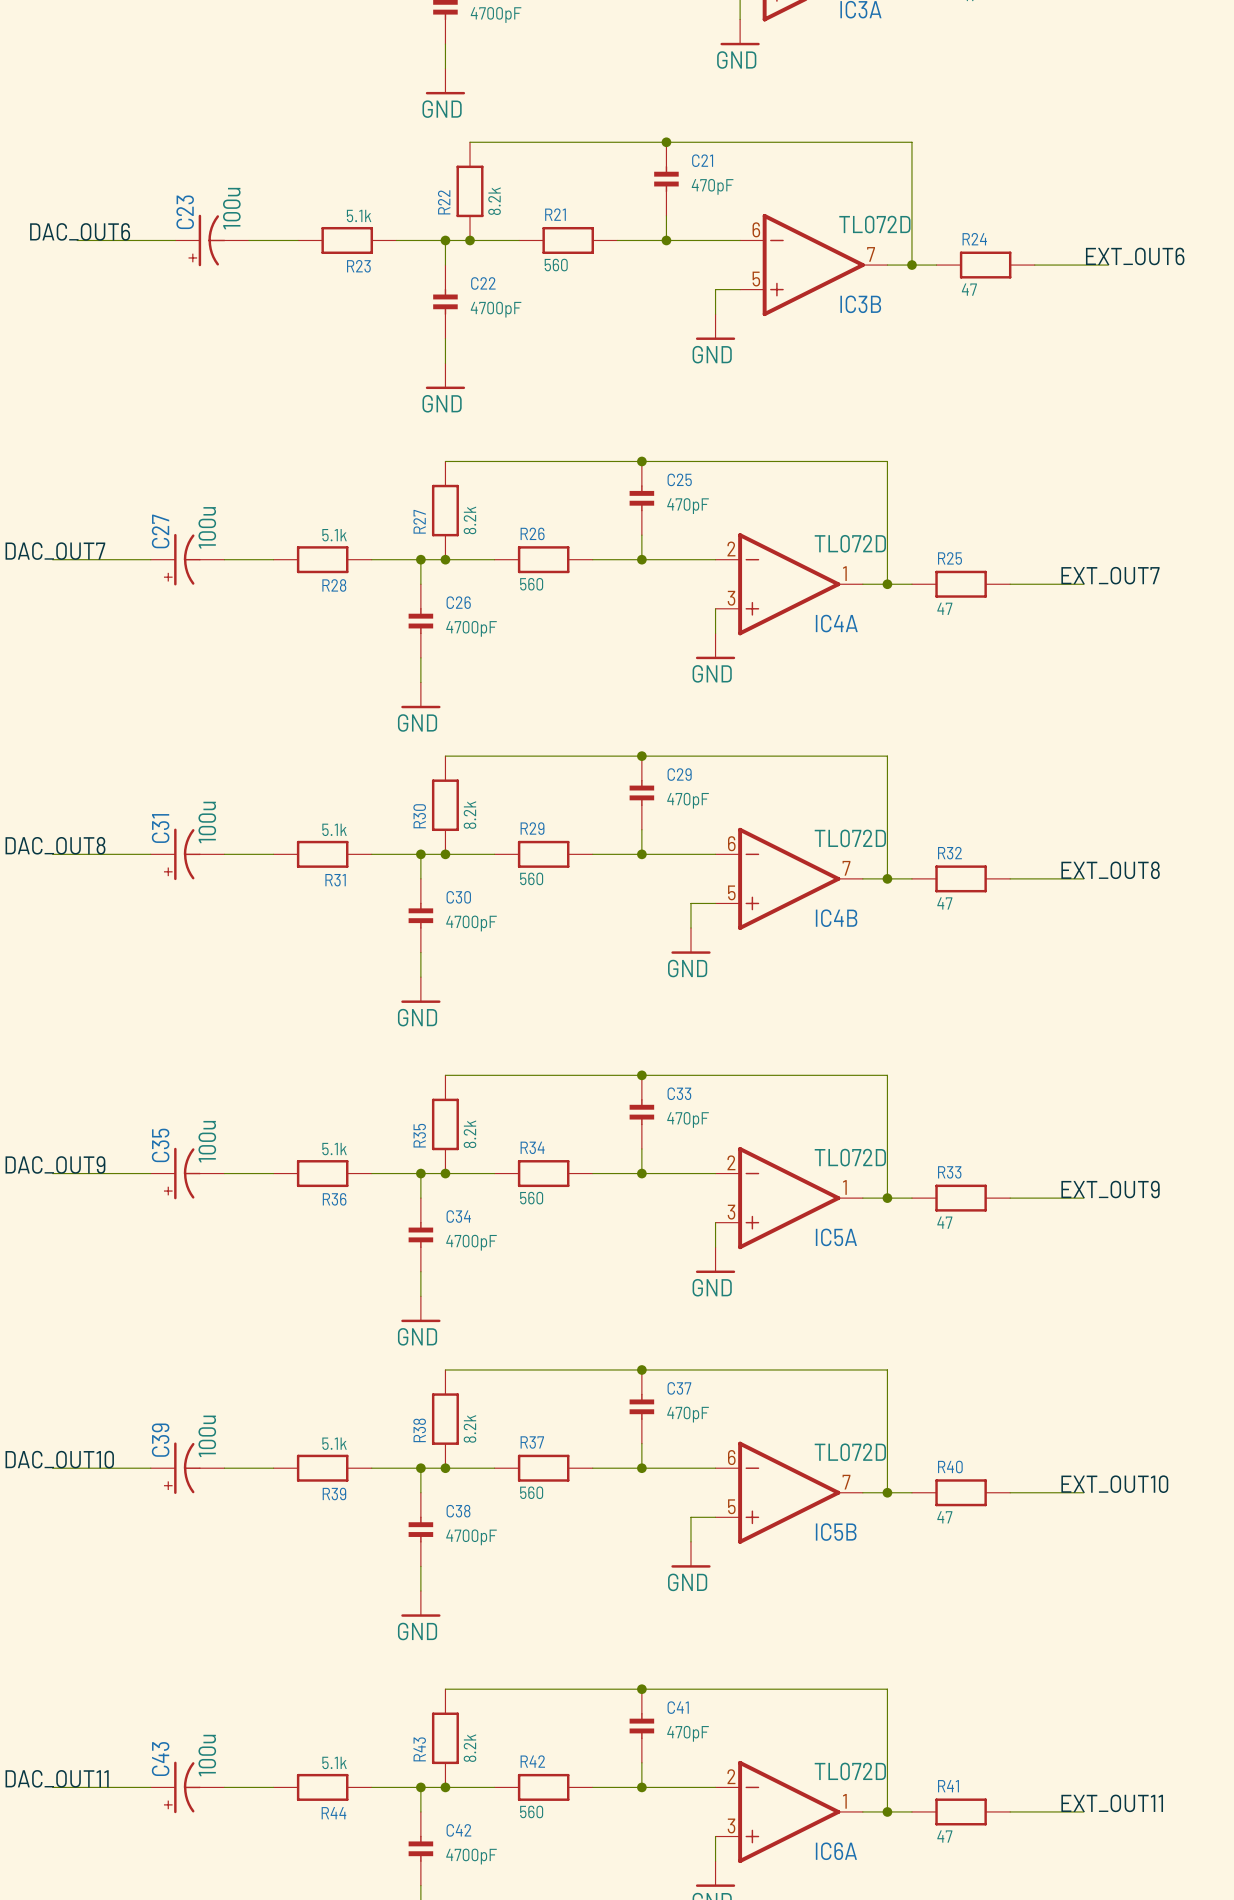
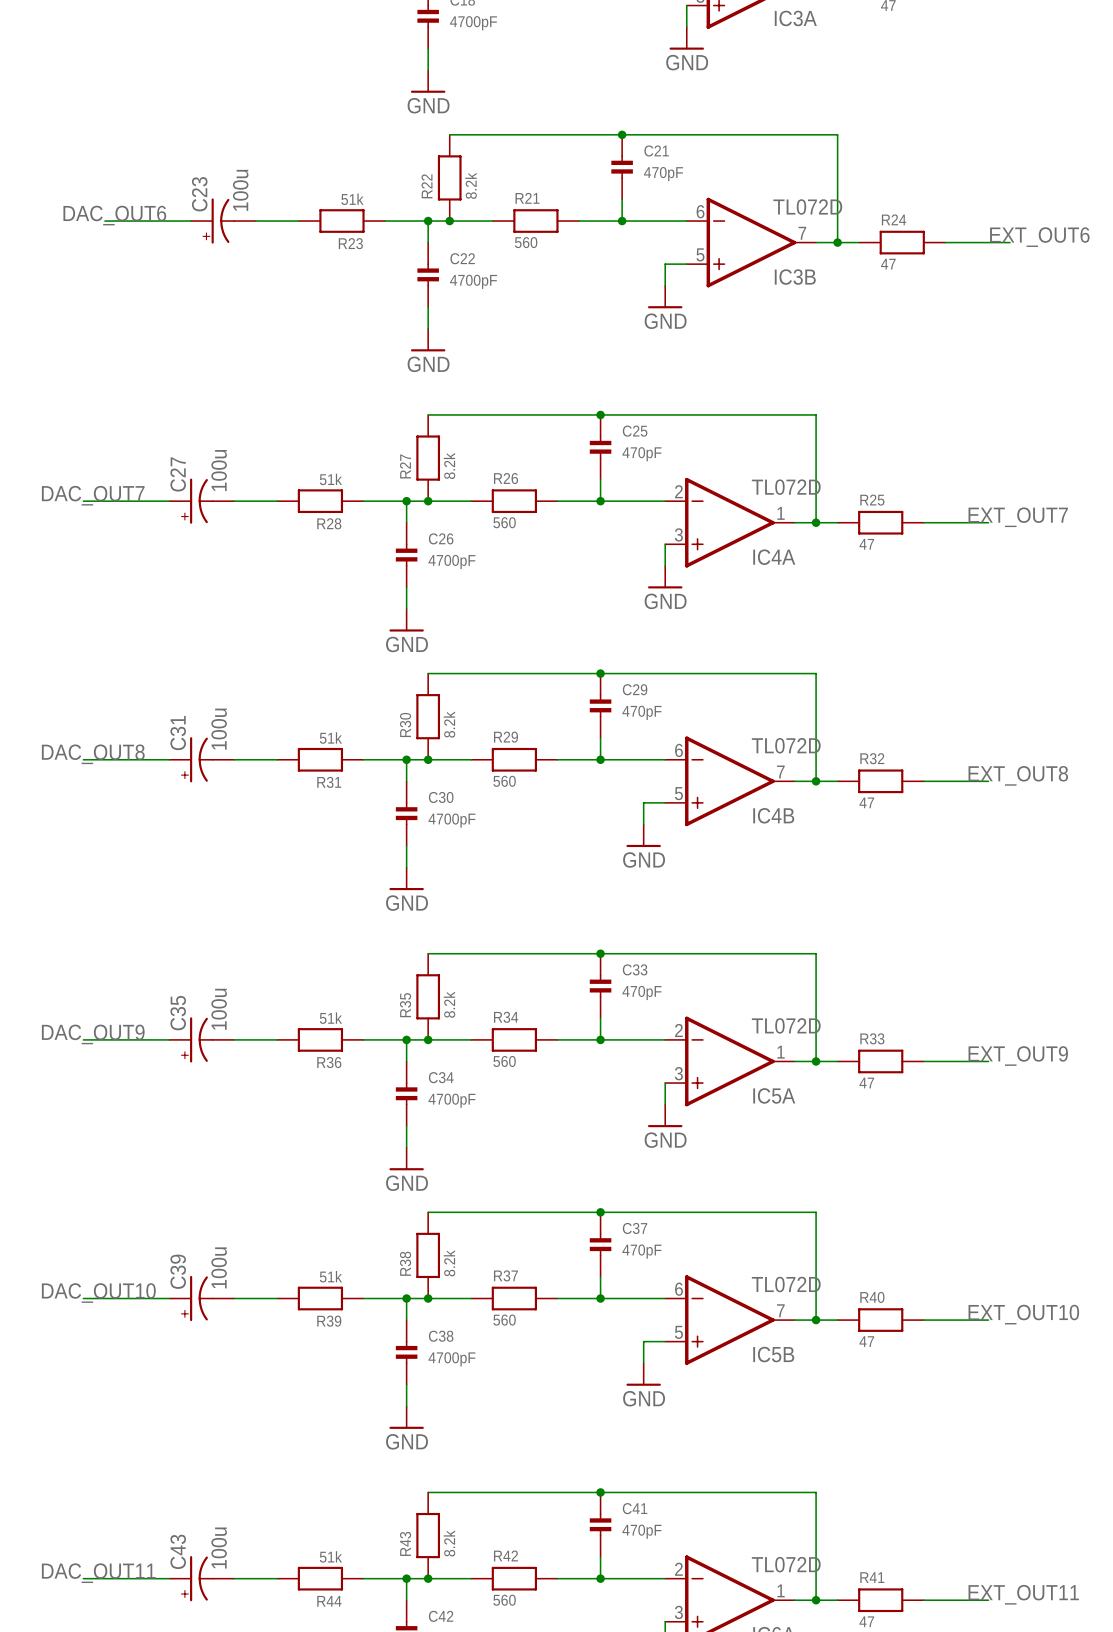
R23 value: 5.1k (359, 215) -> 51k (352, 199)
R28 value: 5.1k (334, 535) -> 51k (330, 479)
R31 value: 5.1k (334, 829) -> 51k (330, 738)
R36 value: 5.1k (334, 1149) -> 51k (330, 1018)
R39 value: 5.1k (334, 1443) -> 51k (330, 1276)
R44 value: 5.1k (334, 1762) -> 51k (330, 1556)

